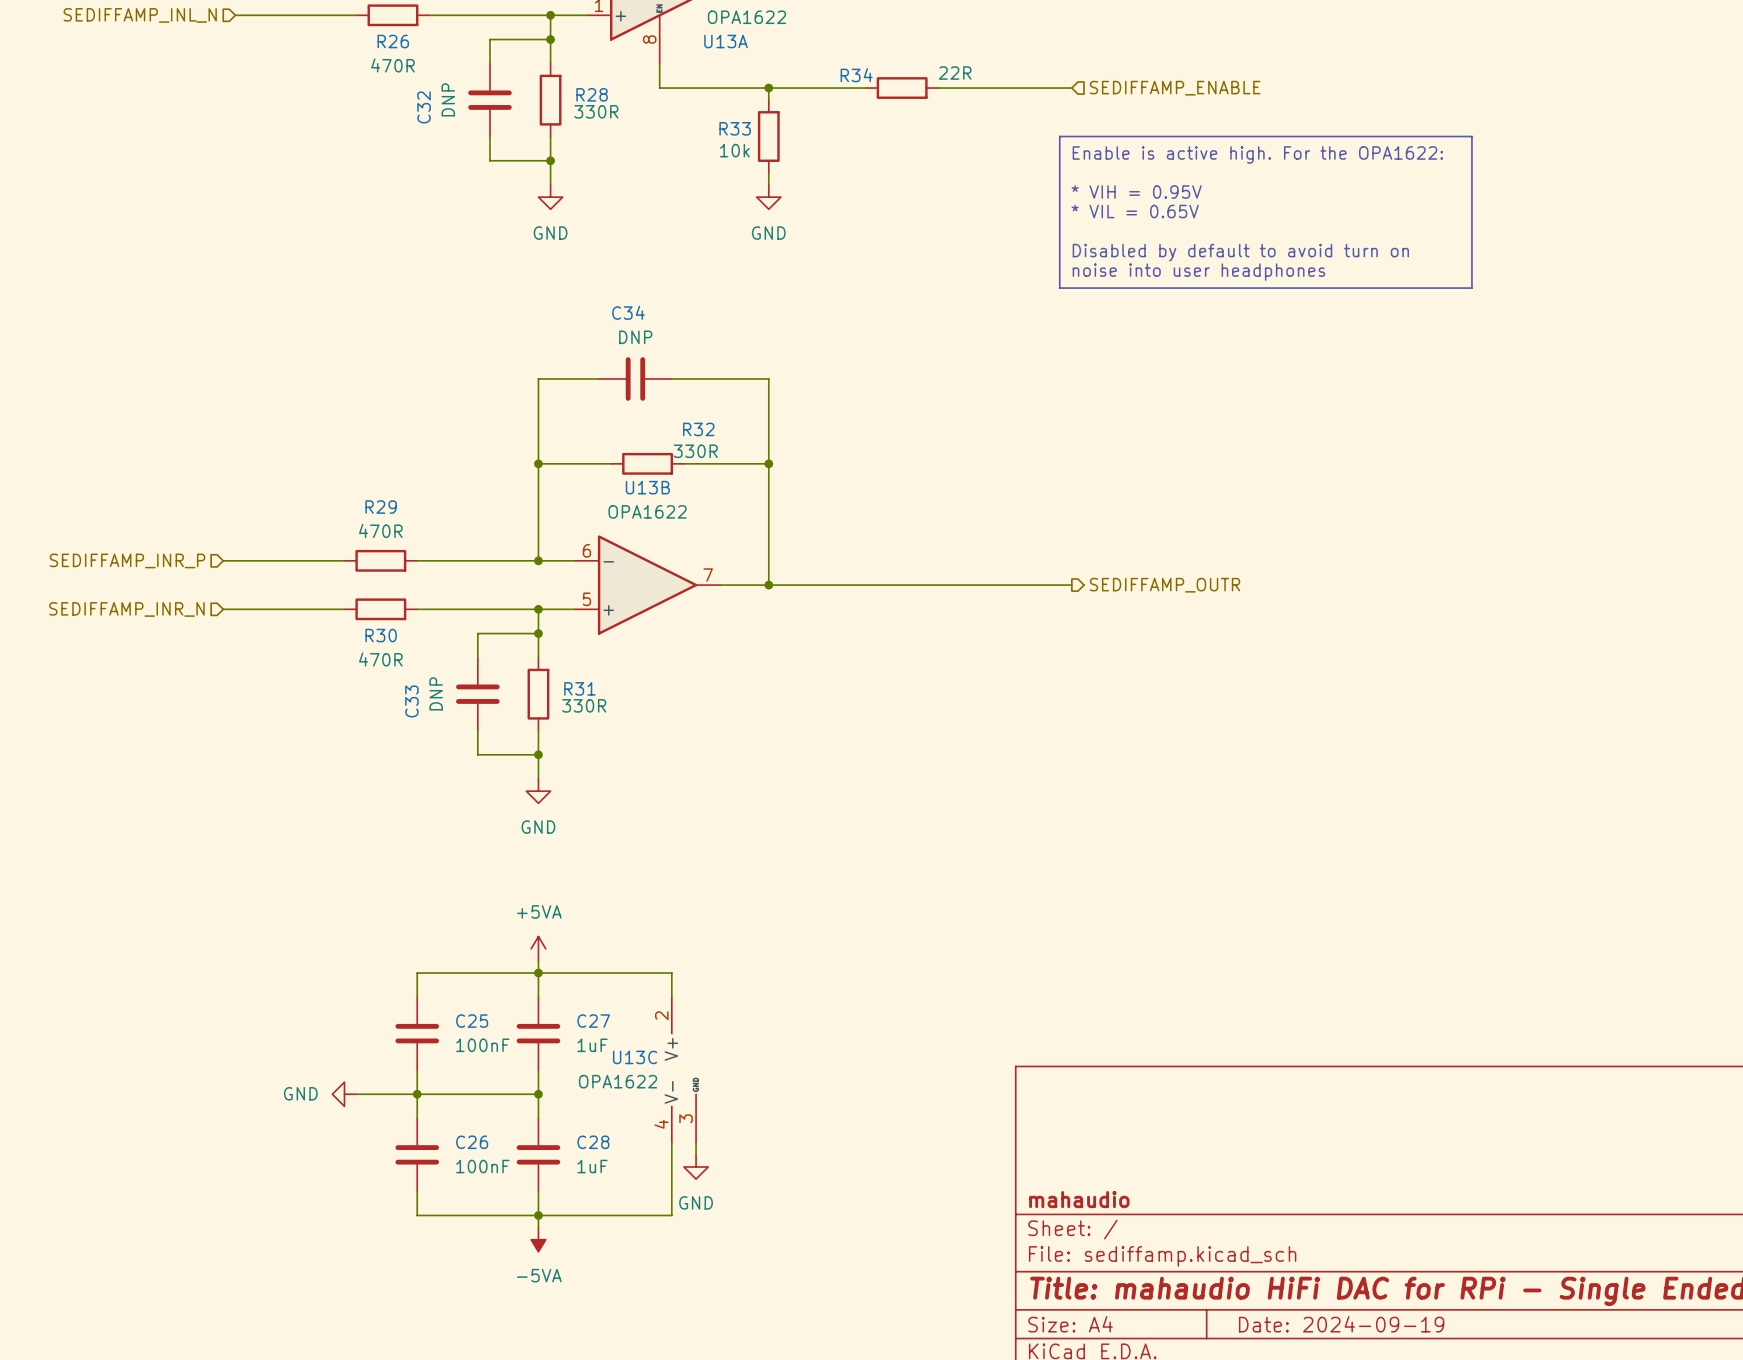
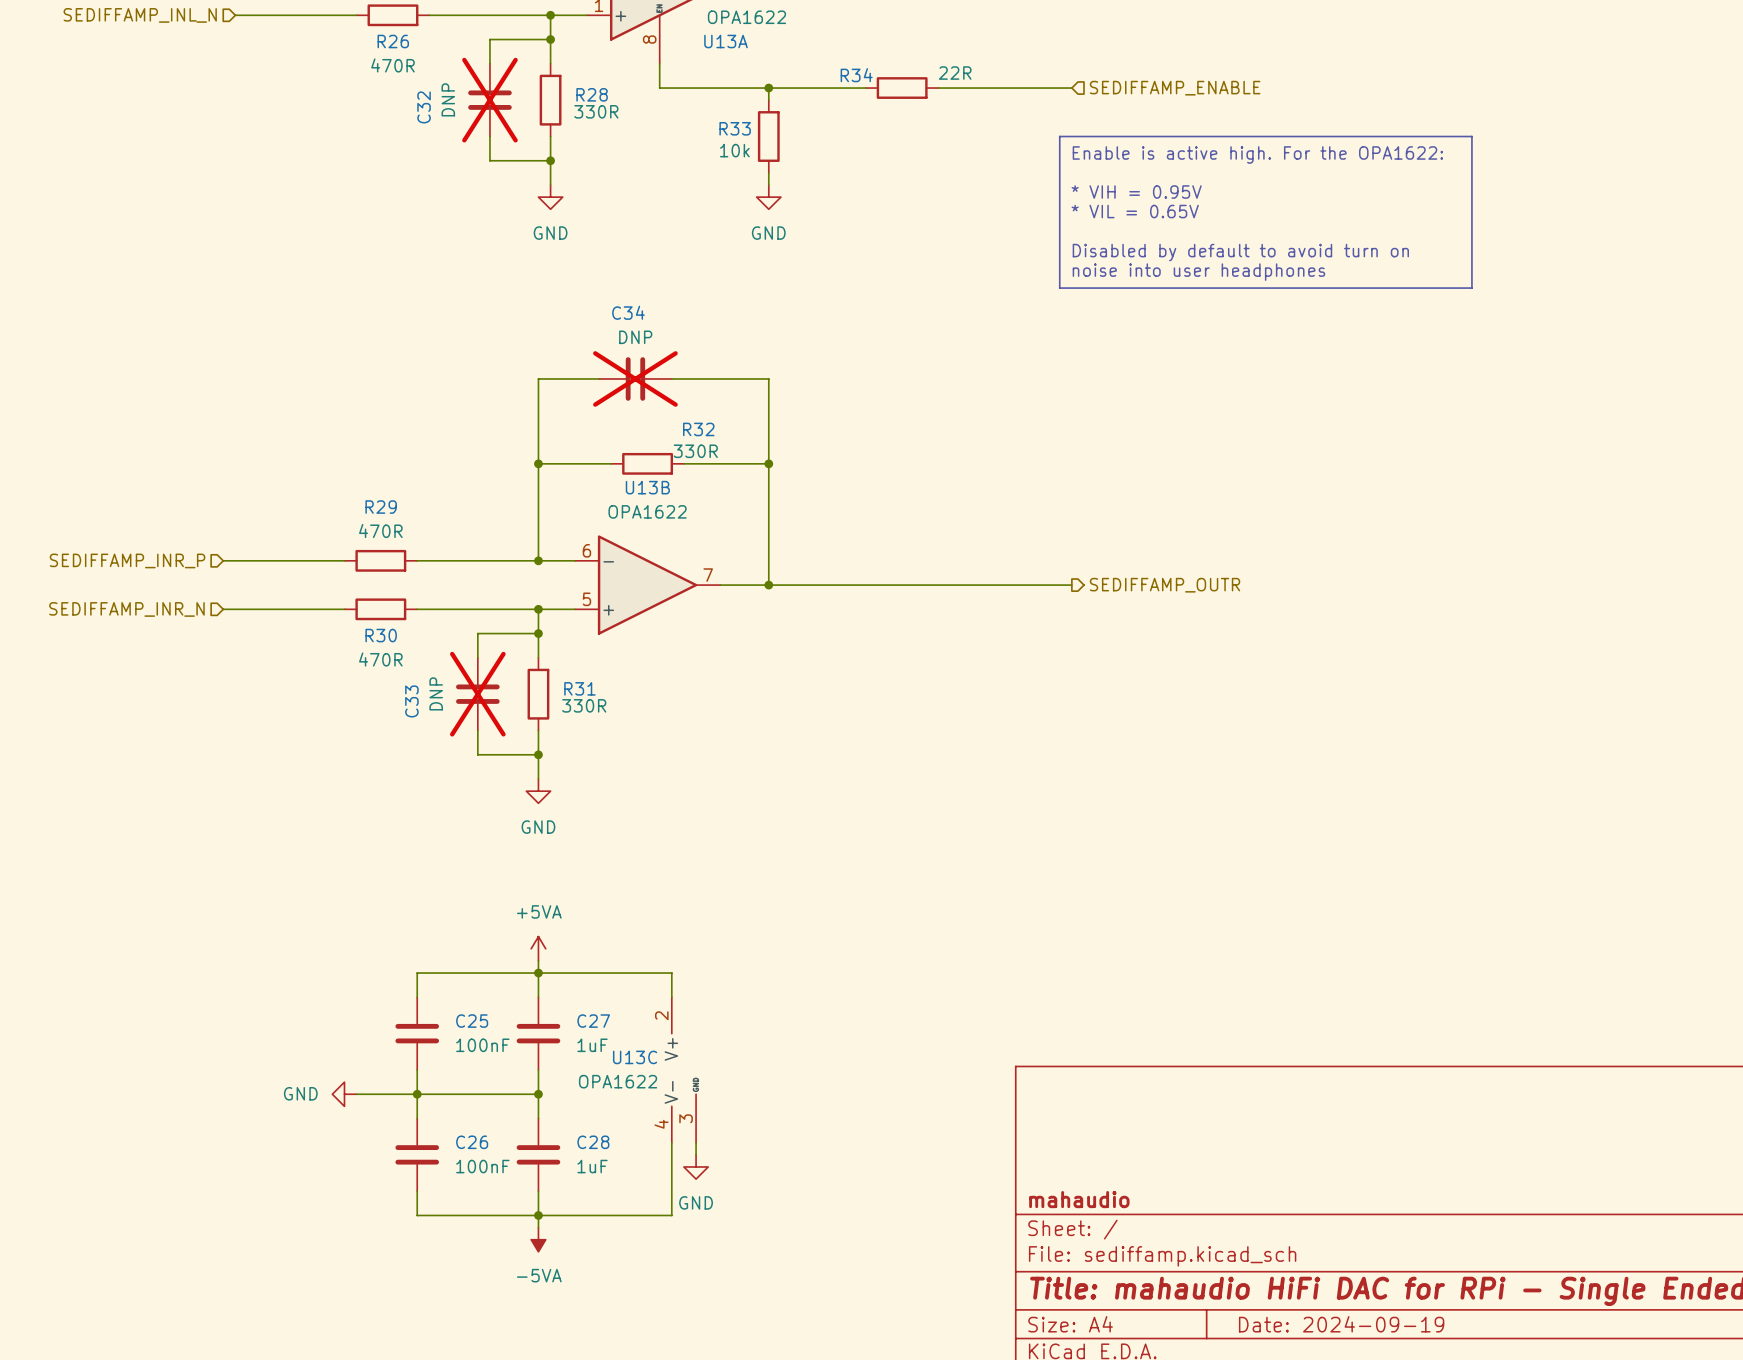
C32 do-not-place cross: none -> (489, 100)
C34 do-not-place cross: none -> (635, 378)
C33 do-not-place cross: none -> (477, 694)

